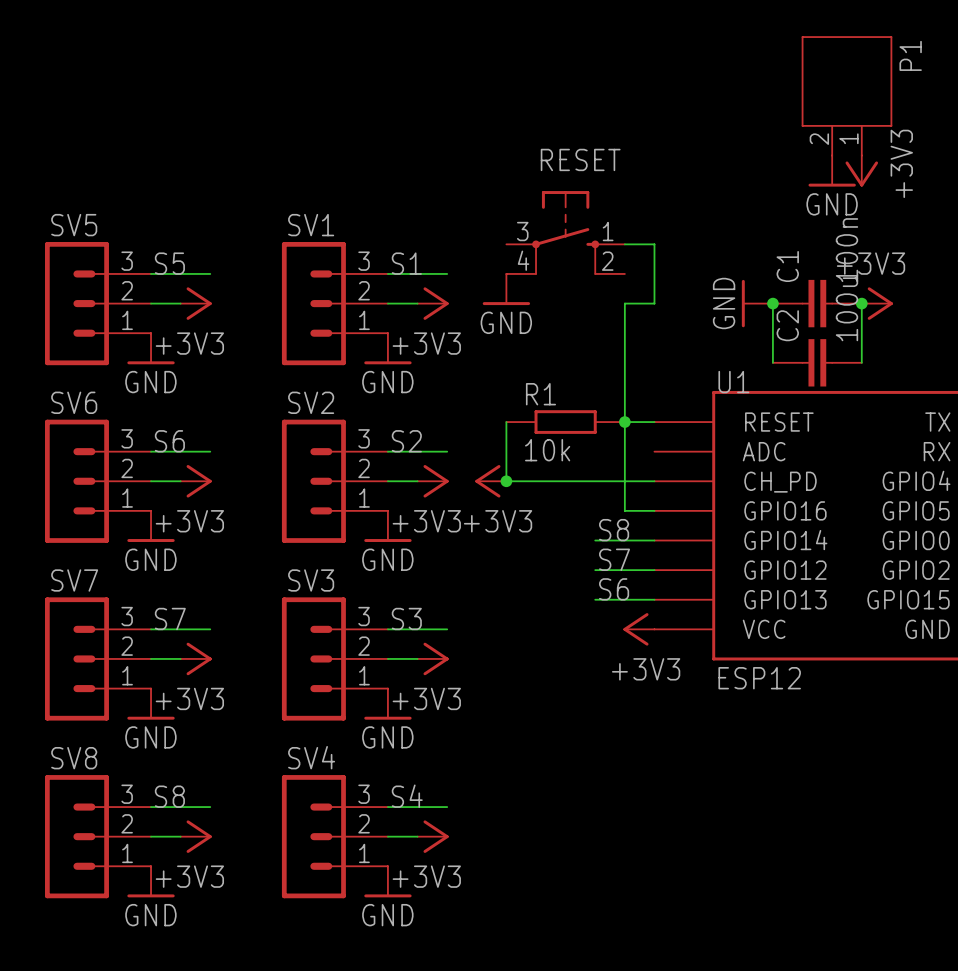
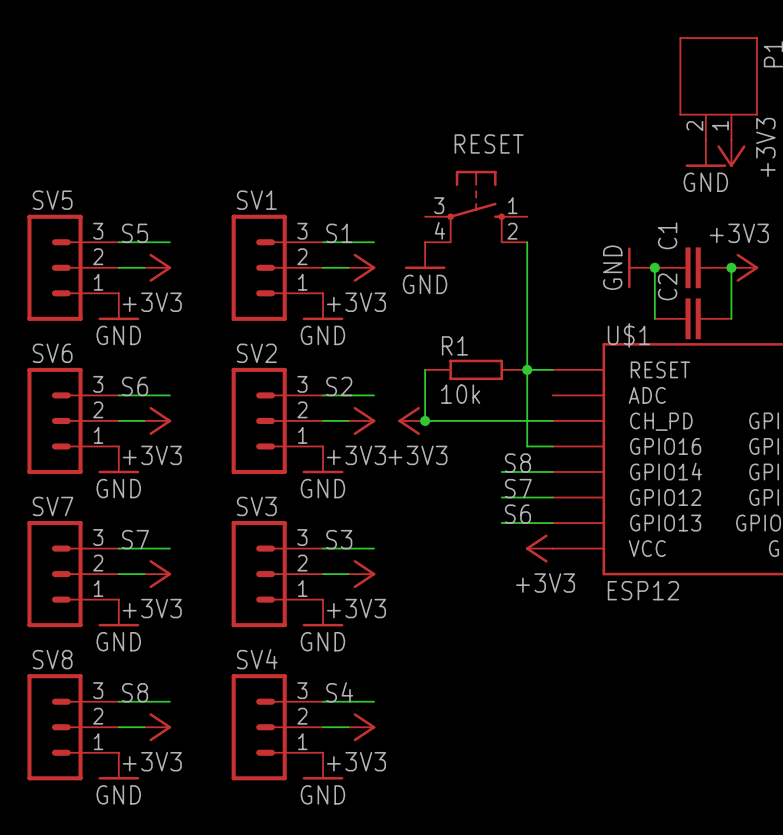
wire: (624, 244) (654, 244) (654, 303) (624, 303) -> (527, 242) (527, 267)
C1 value: 100n (846, 250) -> none
C2 value: 100u (846, 309) -> none
U1 name: U1 (733, 382) -> U$1 (628, 335)

